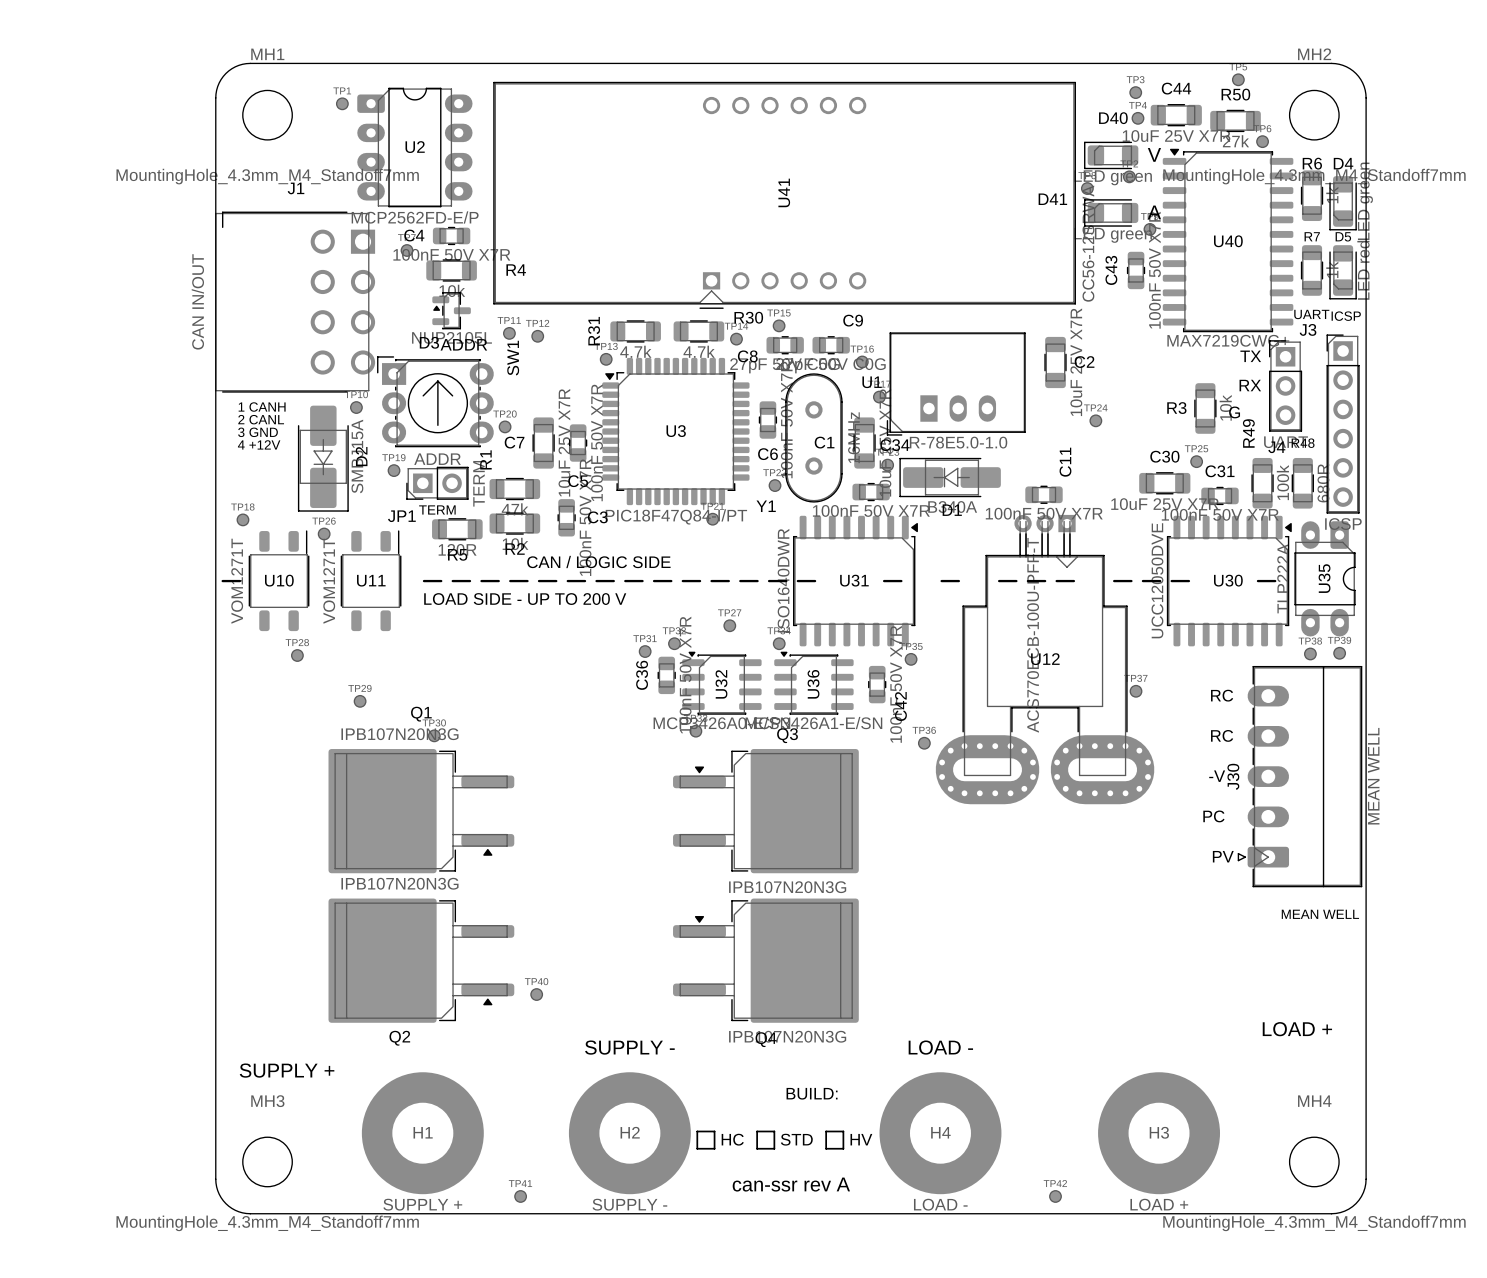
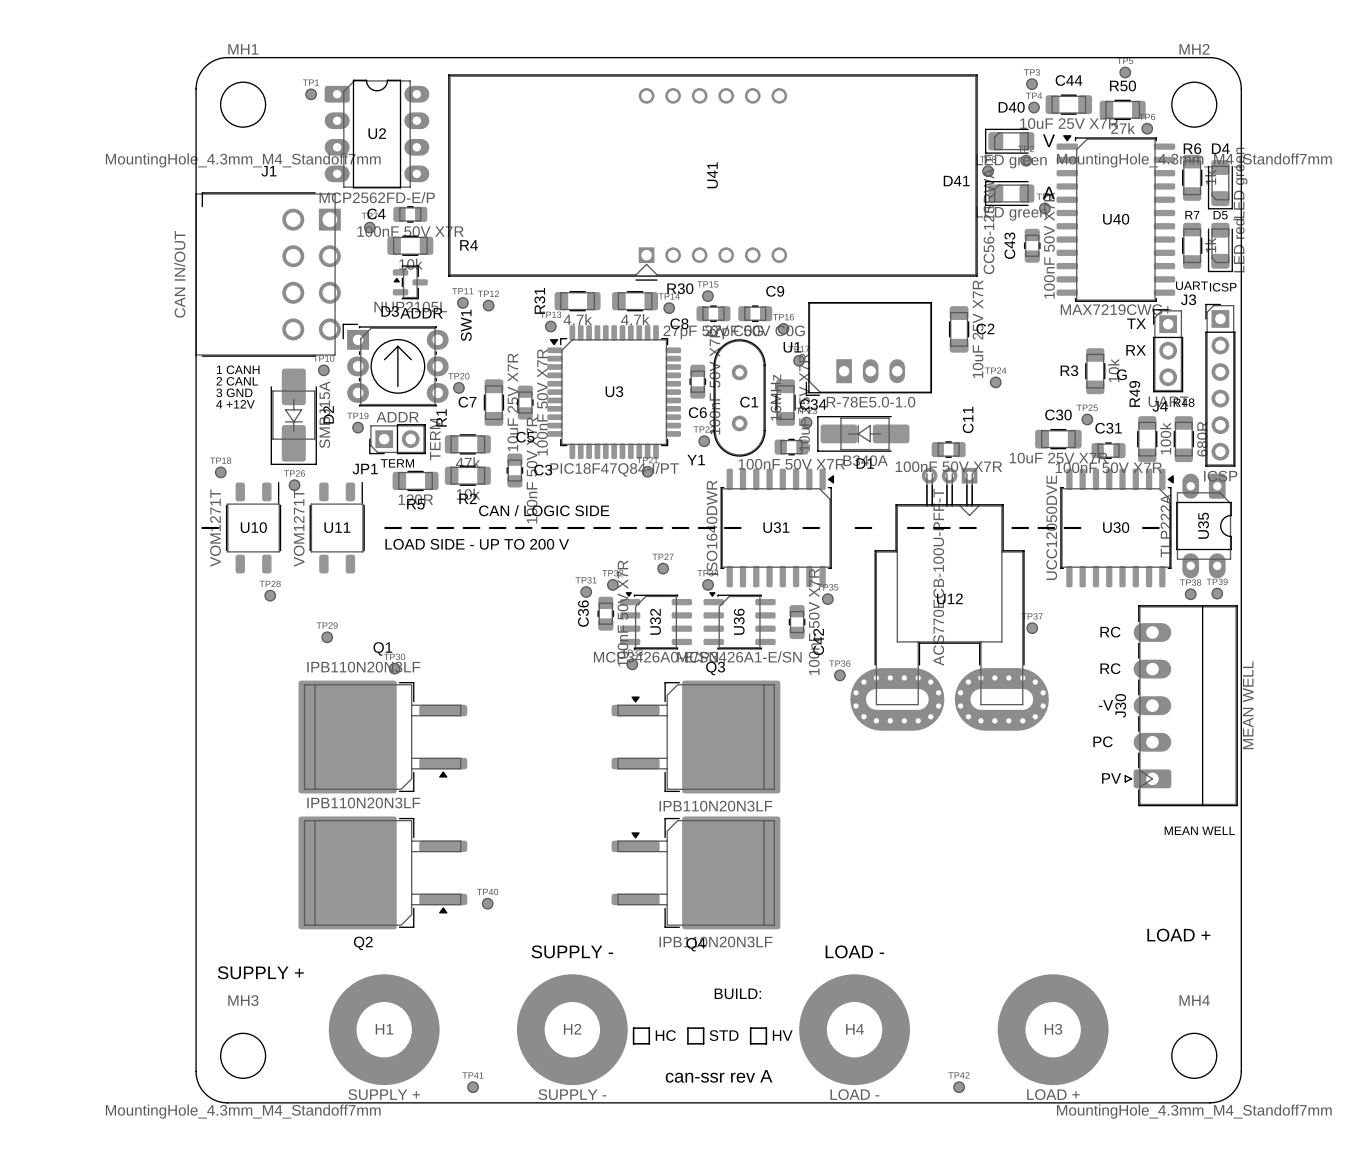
Q1 value: IPB107N20N3G (399, 734) -> IPB110N20N3LF (363, 667)
Q2 value: IPB107N20N3G (399, 883) -> IPB110N20N3LF (363, 803)
Q3 value: IPB107N20N3G (787, 887) -> IPB110N20N3LF (715, 806)
Q4 value: IPB107N20N3G (787, 1036) -> IPB110N20N3LF (715, 942)

